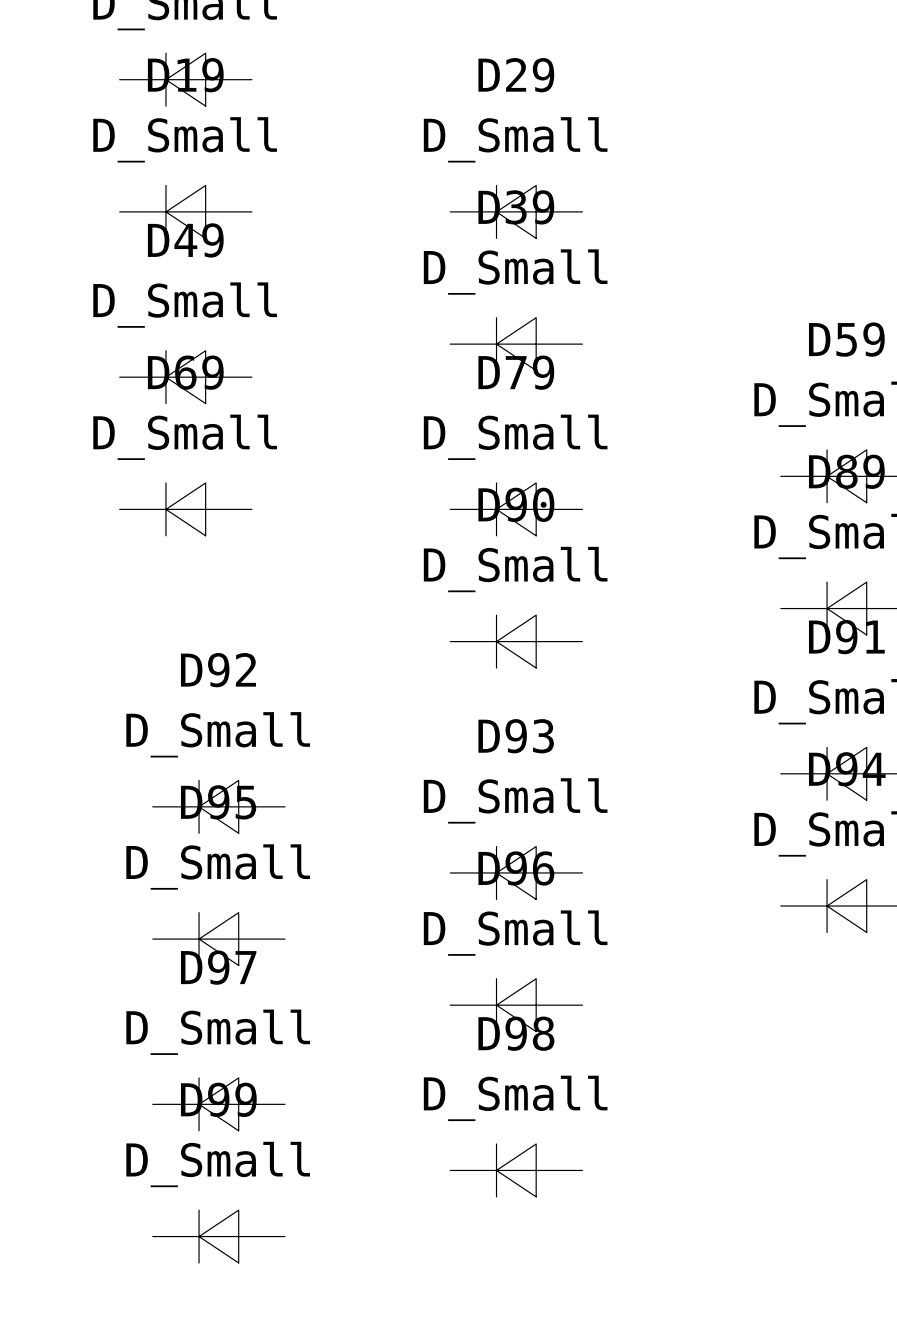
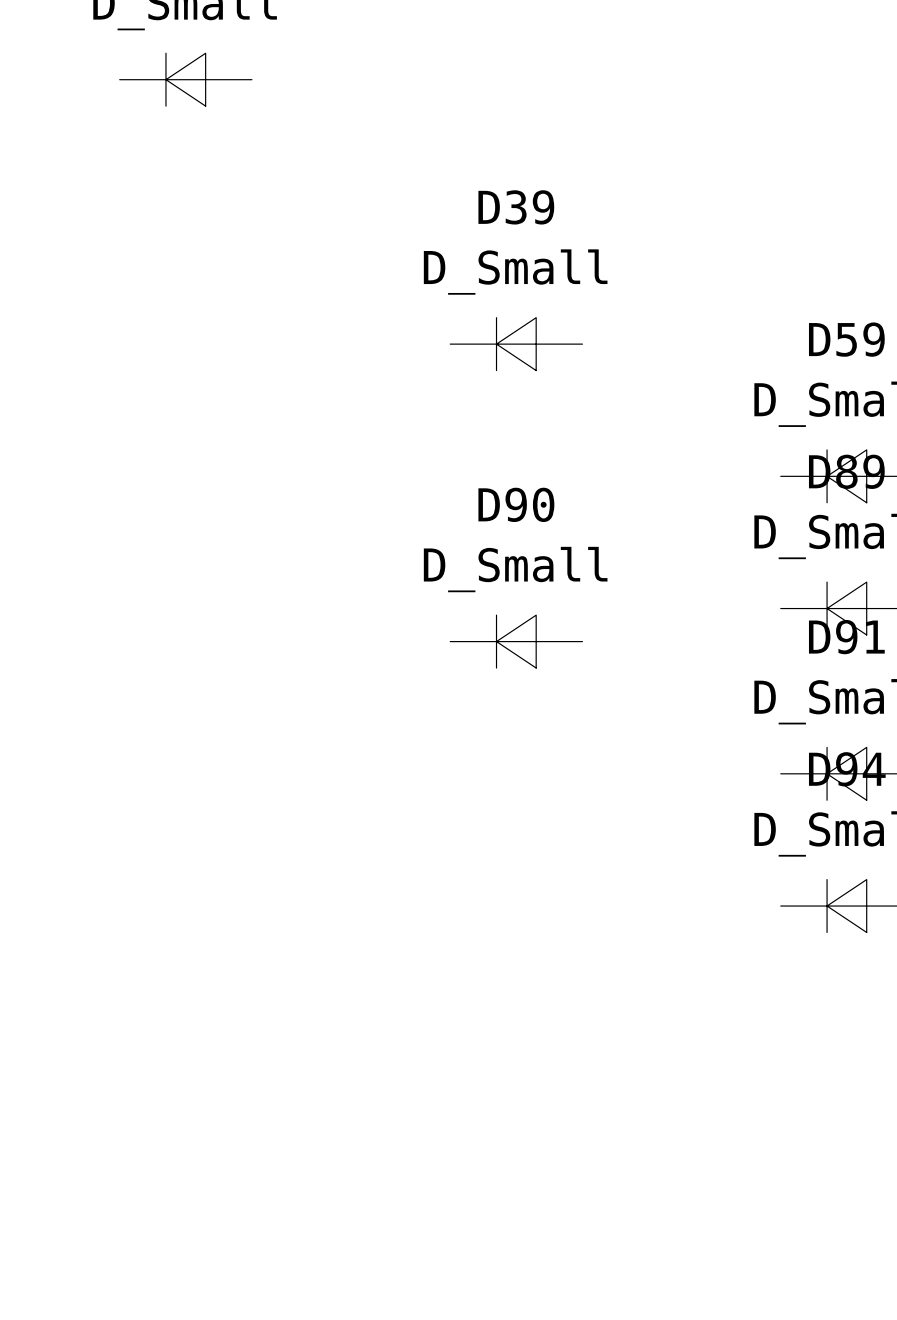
D19: D_Small (185, 211) -> none
D29: D_Small (516, 211) -> none
D49: D_Small (185, 377) -> none
D69: D_Small (185, 509) -> none
D79: D_Small (516, 509) -> none
D92: D_Small (218, 806) -> none
D93: D_Small (516, 872) -> none
D95: D_Small (218, 939) -> none
D96: D_Small (516, 1005) -> none
D97: D_Small (218, 1104) -> none
D98: D_Small (516, 1170) -> none
D99: D_Small (218, 1236) -> none

